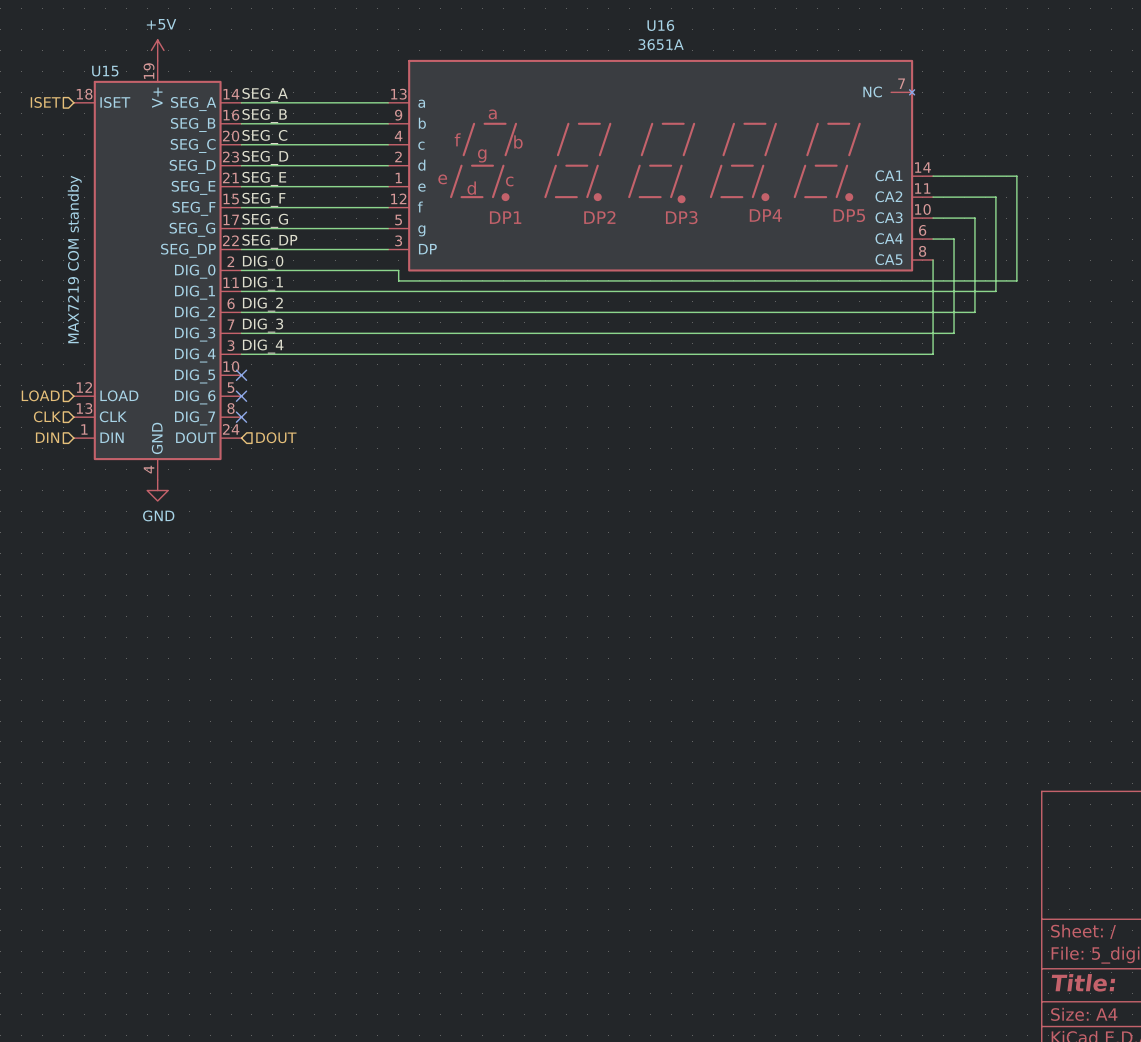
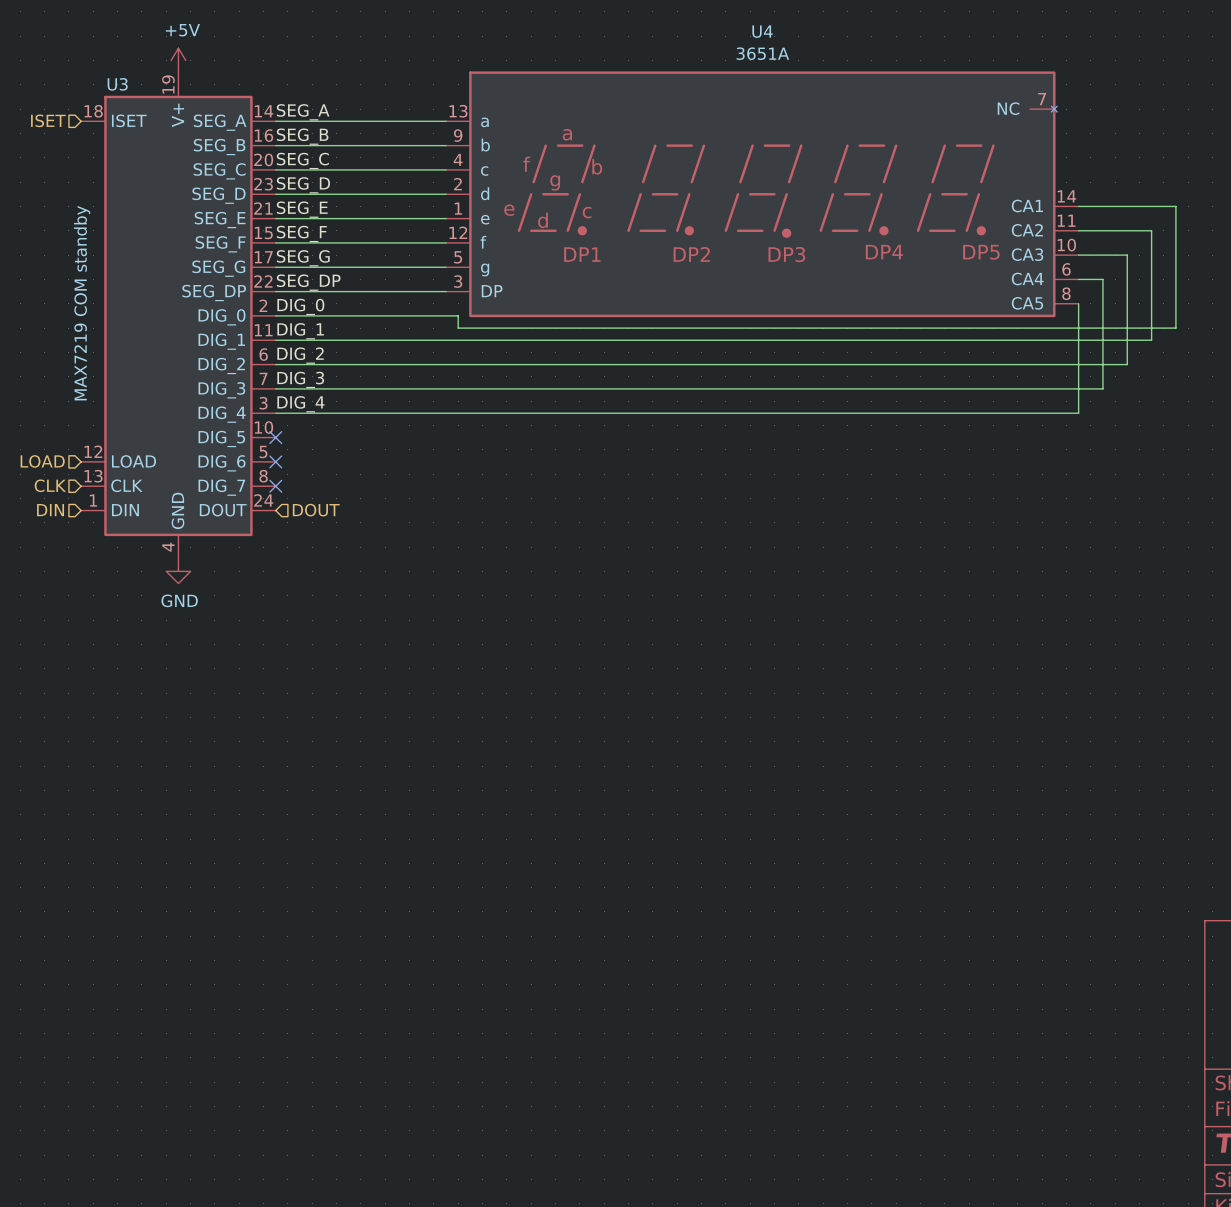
U16 name: U16 (660, 25) -> U4 (762, 31)
U15 name: U15 (105, 71) -> U3 (117, 84)

